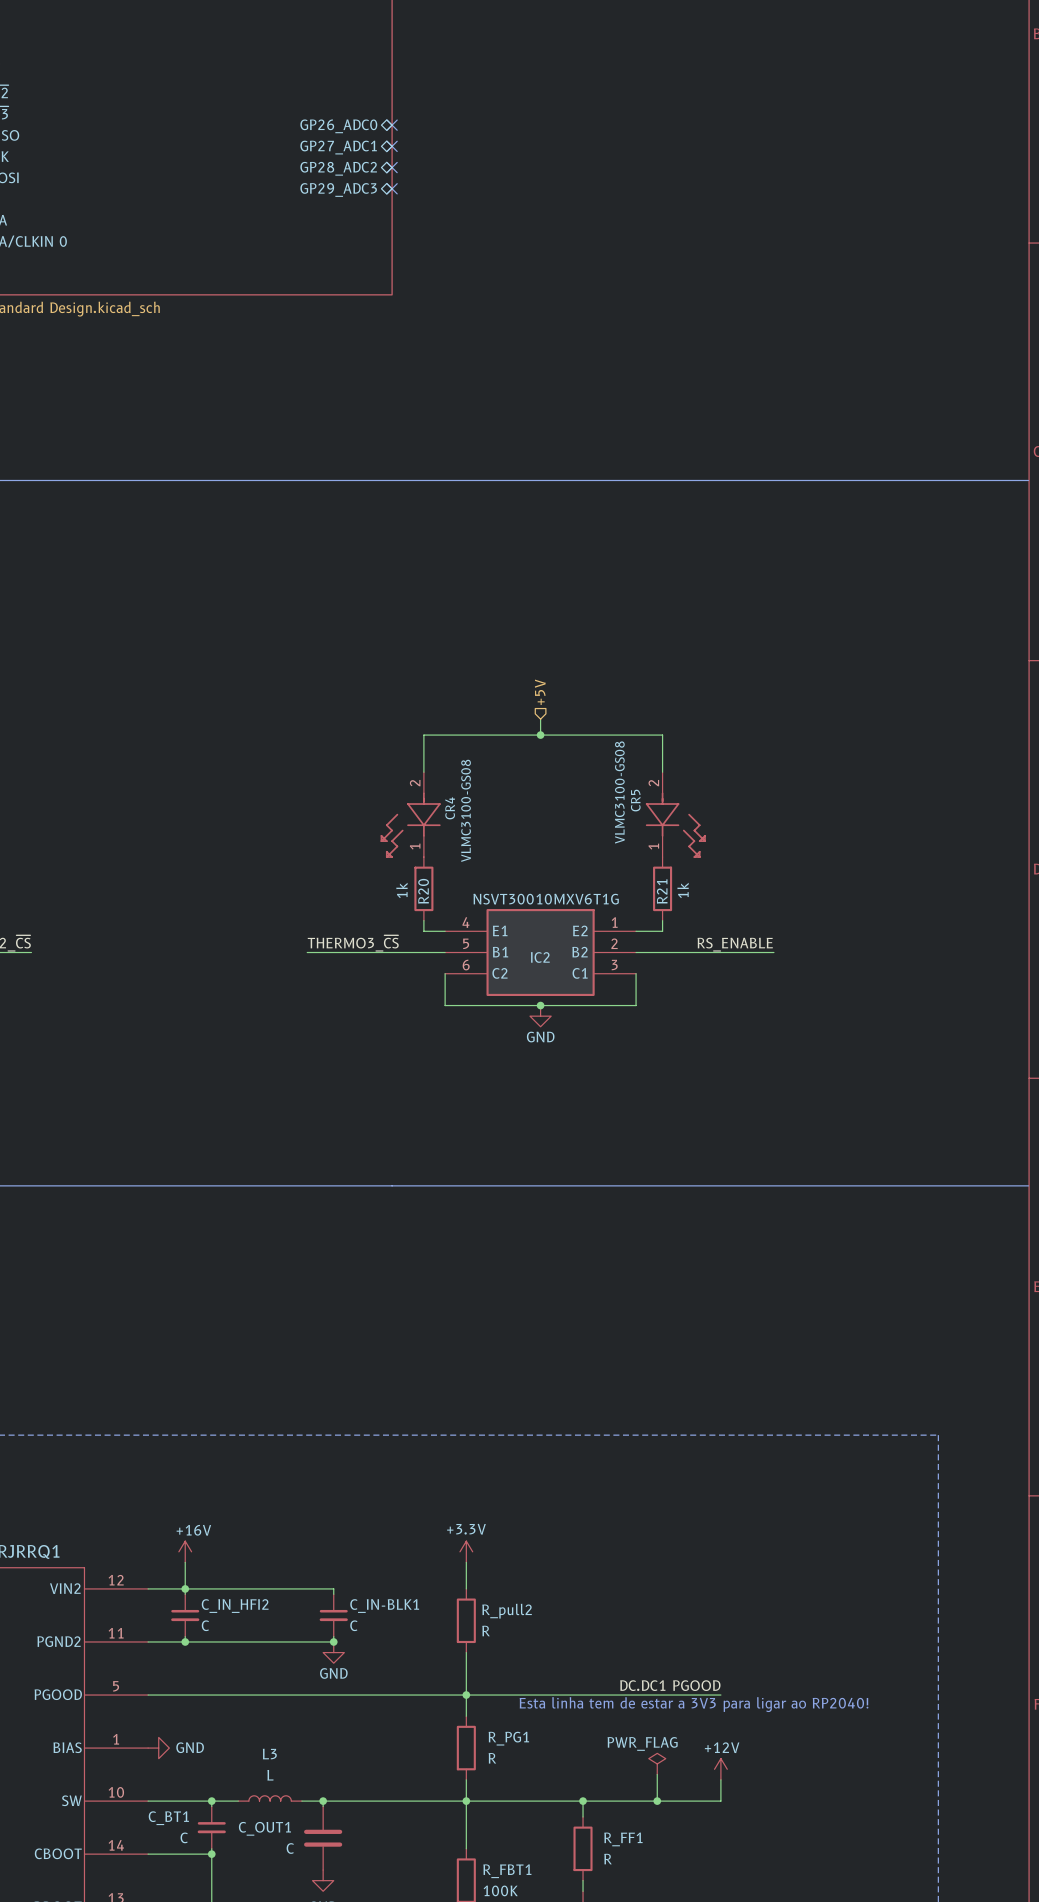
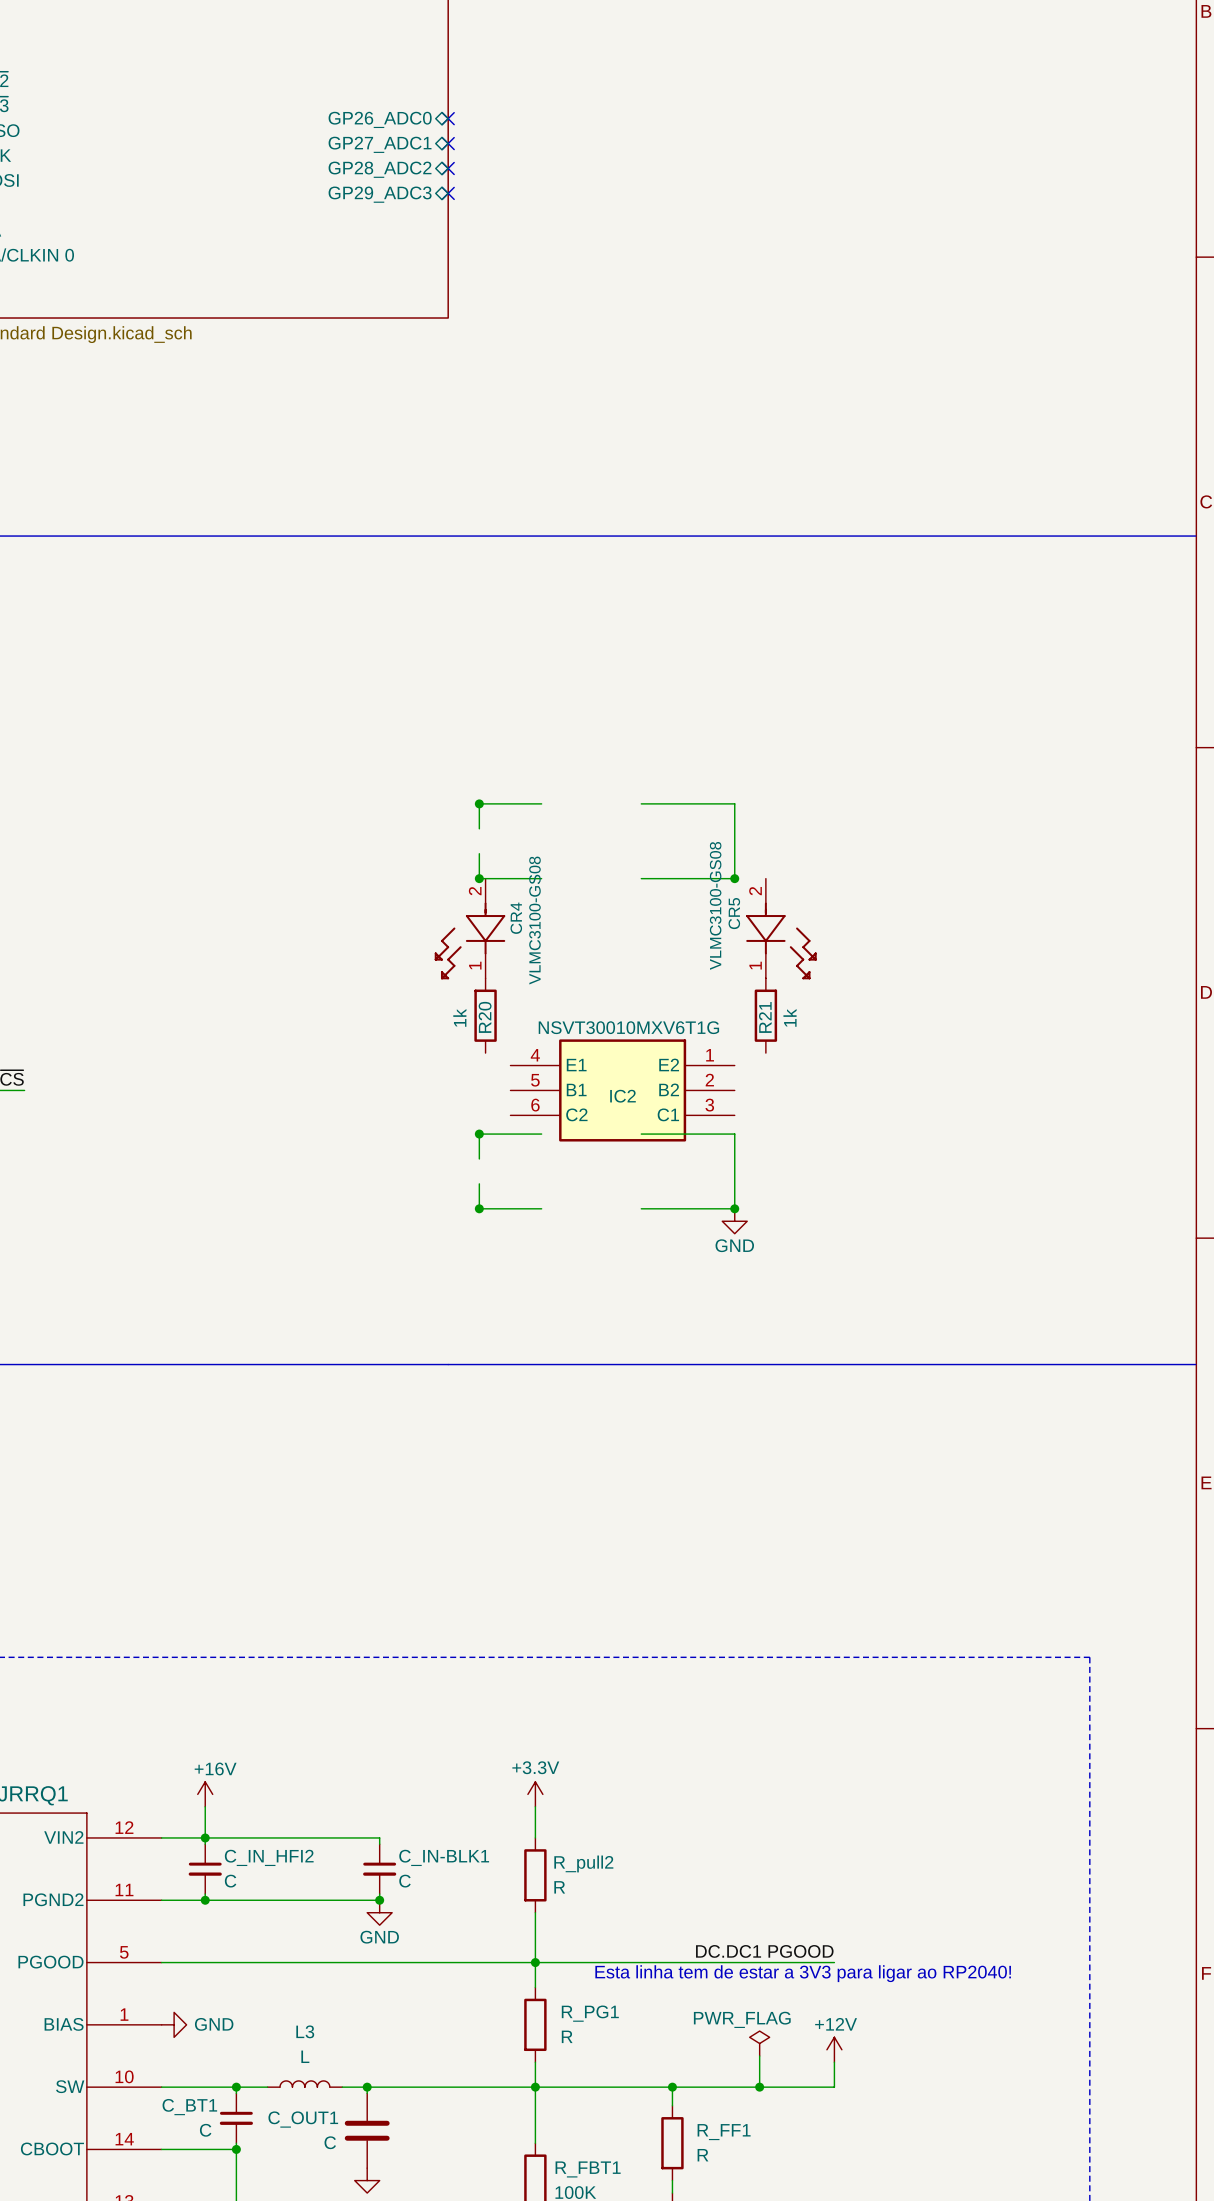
hierarchical label: +5V (540, 692) -> none
junction: none -> (479, 803)
wire: none -> (541, 803) (479, 803) (479, 828)
wire: none -> (641, 803) (734, 803) (734, 878) (641, 878)
wire: (540, 719) (540, 735) -> none
junction: (540, 735) -> none
wire: none -> (479, 853) (479, 878) (541, 878)
junction: none -> (479, 878)
wire: (423, 772) (423, 735) (662, 735) (662, 772) -> none
junction: none -> (734, 878)
wire: (423, 920) (423, 931) (445, 931) -> none
wire: (662, 920) (662, 931) (636, 931) -> none
label: THERMO3_~{CS} (353, 943) -> none
label: RS_ENABLE (735, 944) -> none
wire: (307, 952) (445, 952) -> none
wire: (636, 952) (773, 952) -> none
wire: (445, 973) (445, 1005) (636, 1005) -> (641, 1208) (734, 1208) (734, 1152)
wire: (636, 973) (636, 989) -> (641, 1134) (734, 1134)
junction: none -> (479, 1134)
wire: none -> (541, 1134) (479, 1134) (479, 1158)
junction: (540, 1005) -> none
power symbol position: GND (540, 1016) -> GND (734, 1221)
wire: none -> (479, 1183) (479, 1208) (541, 1208)
junction: none -> (479, 1208)
junction: none -> (734, 1208)

